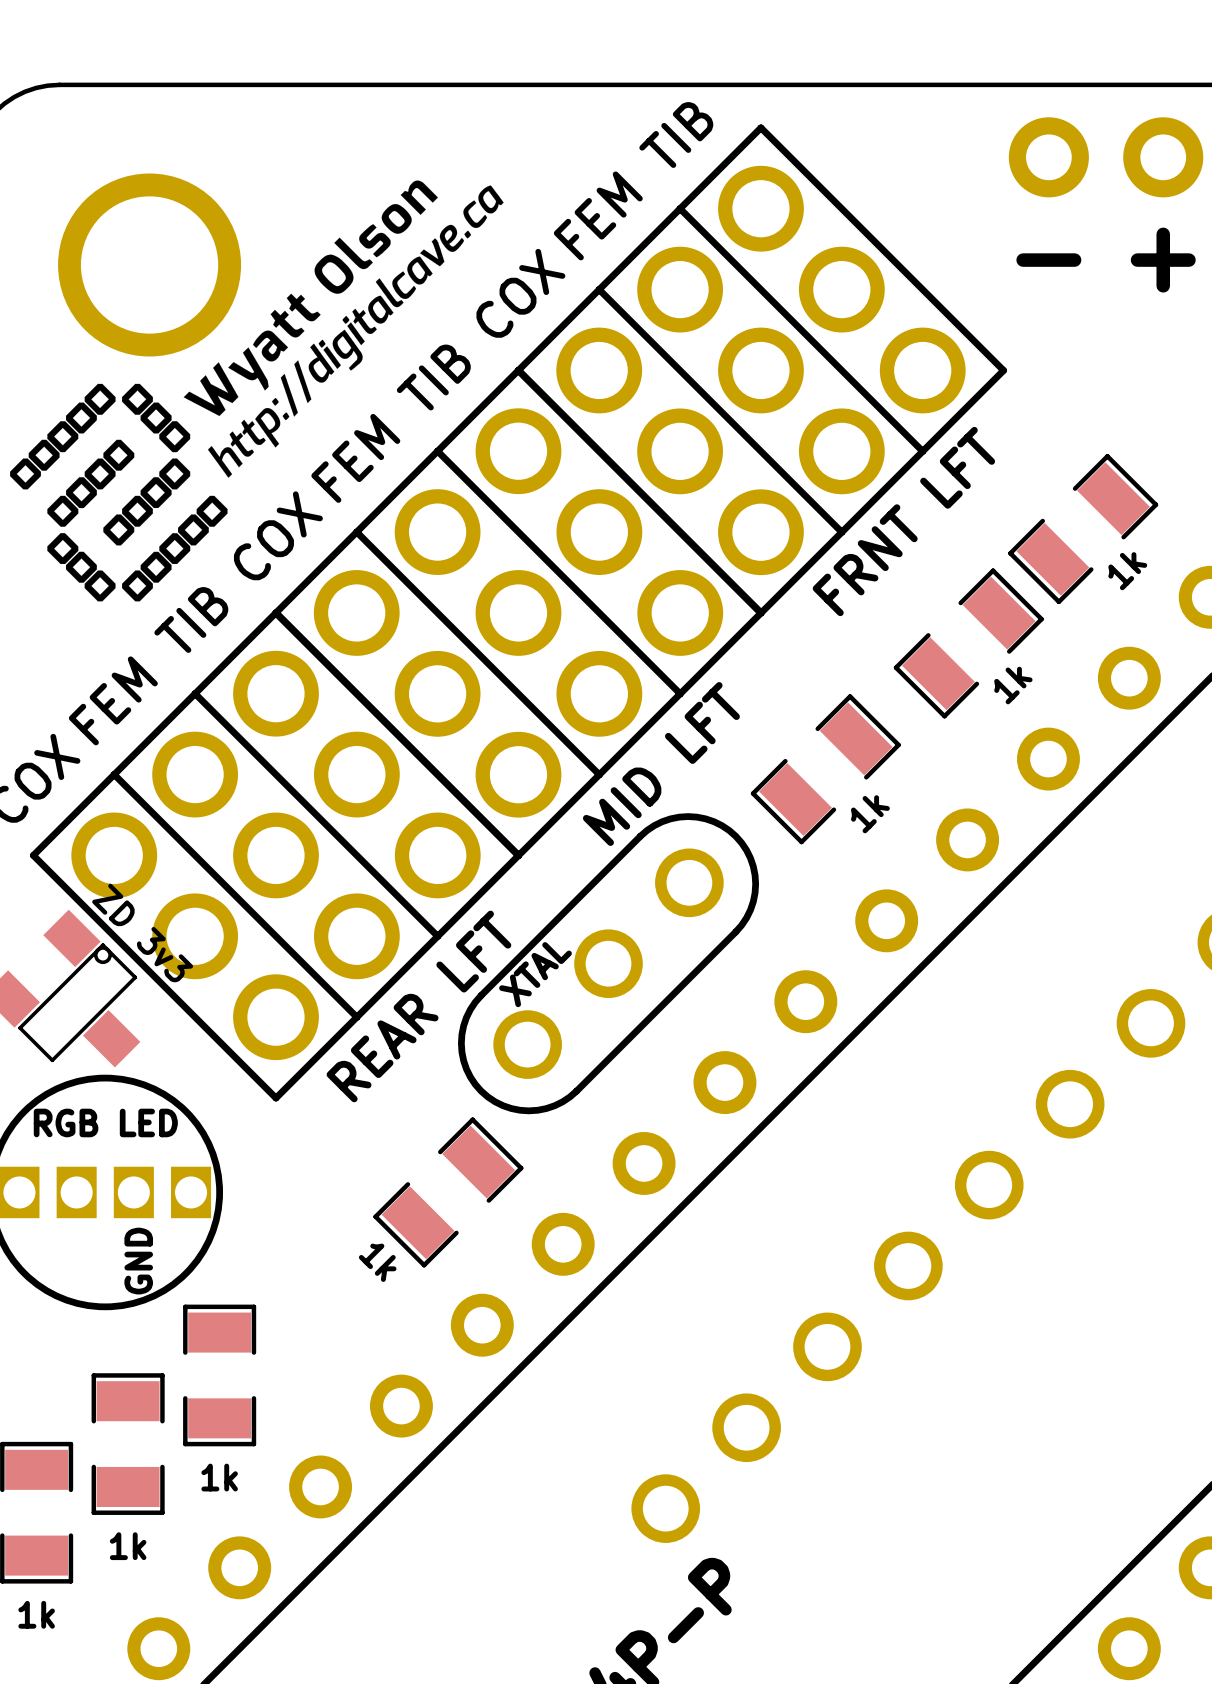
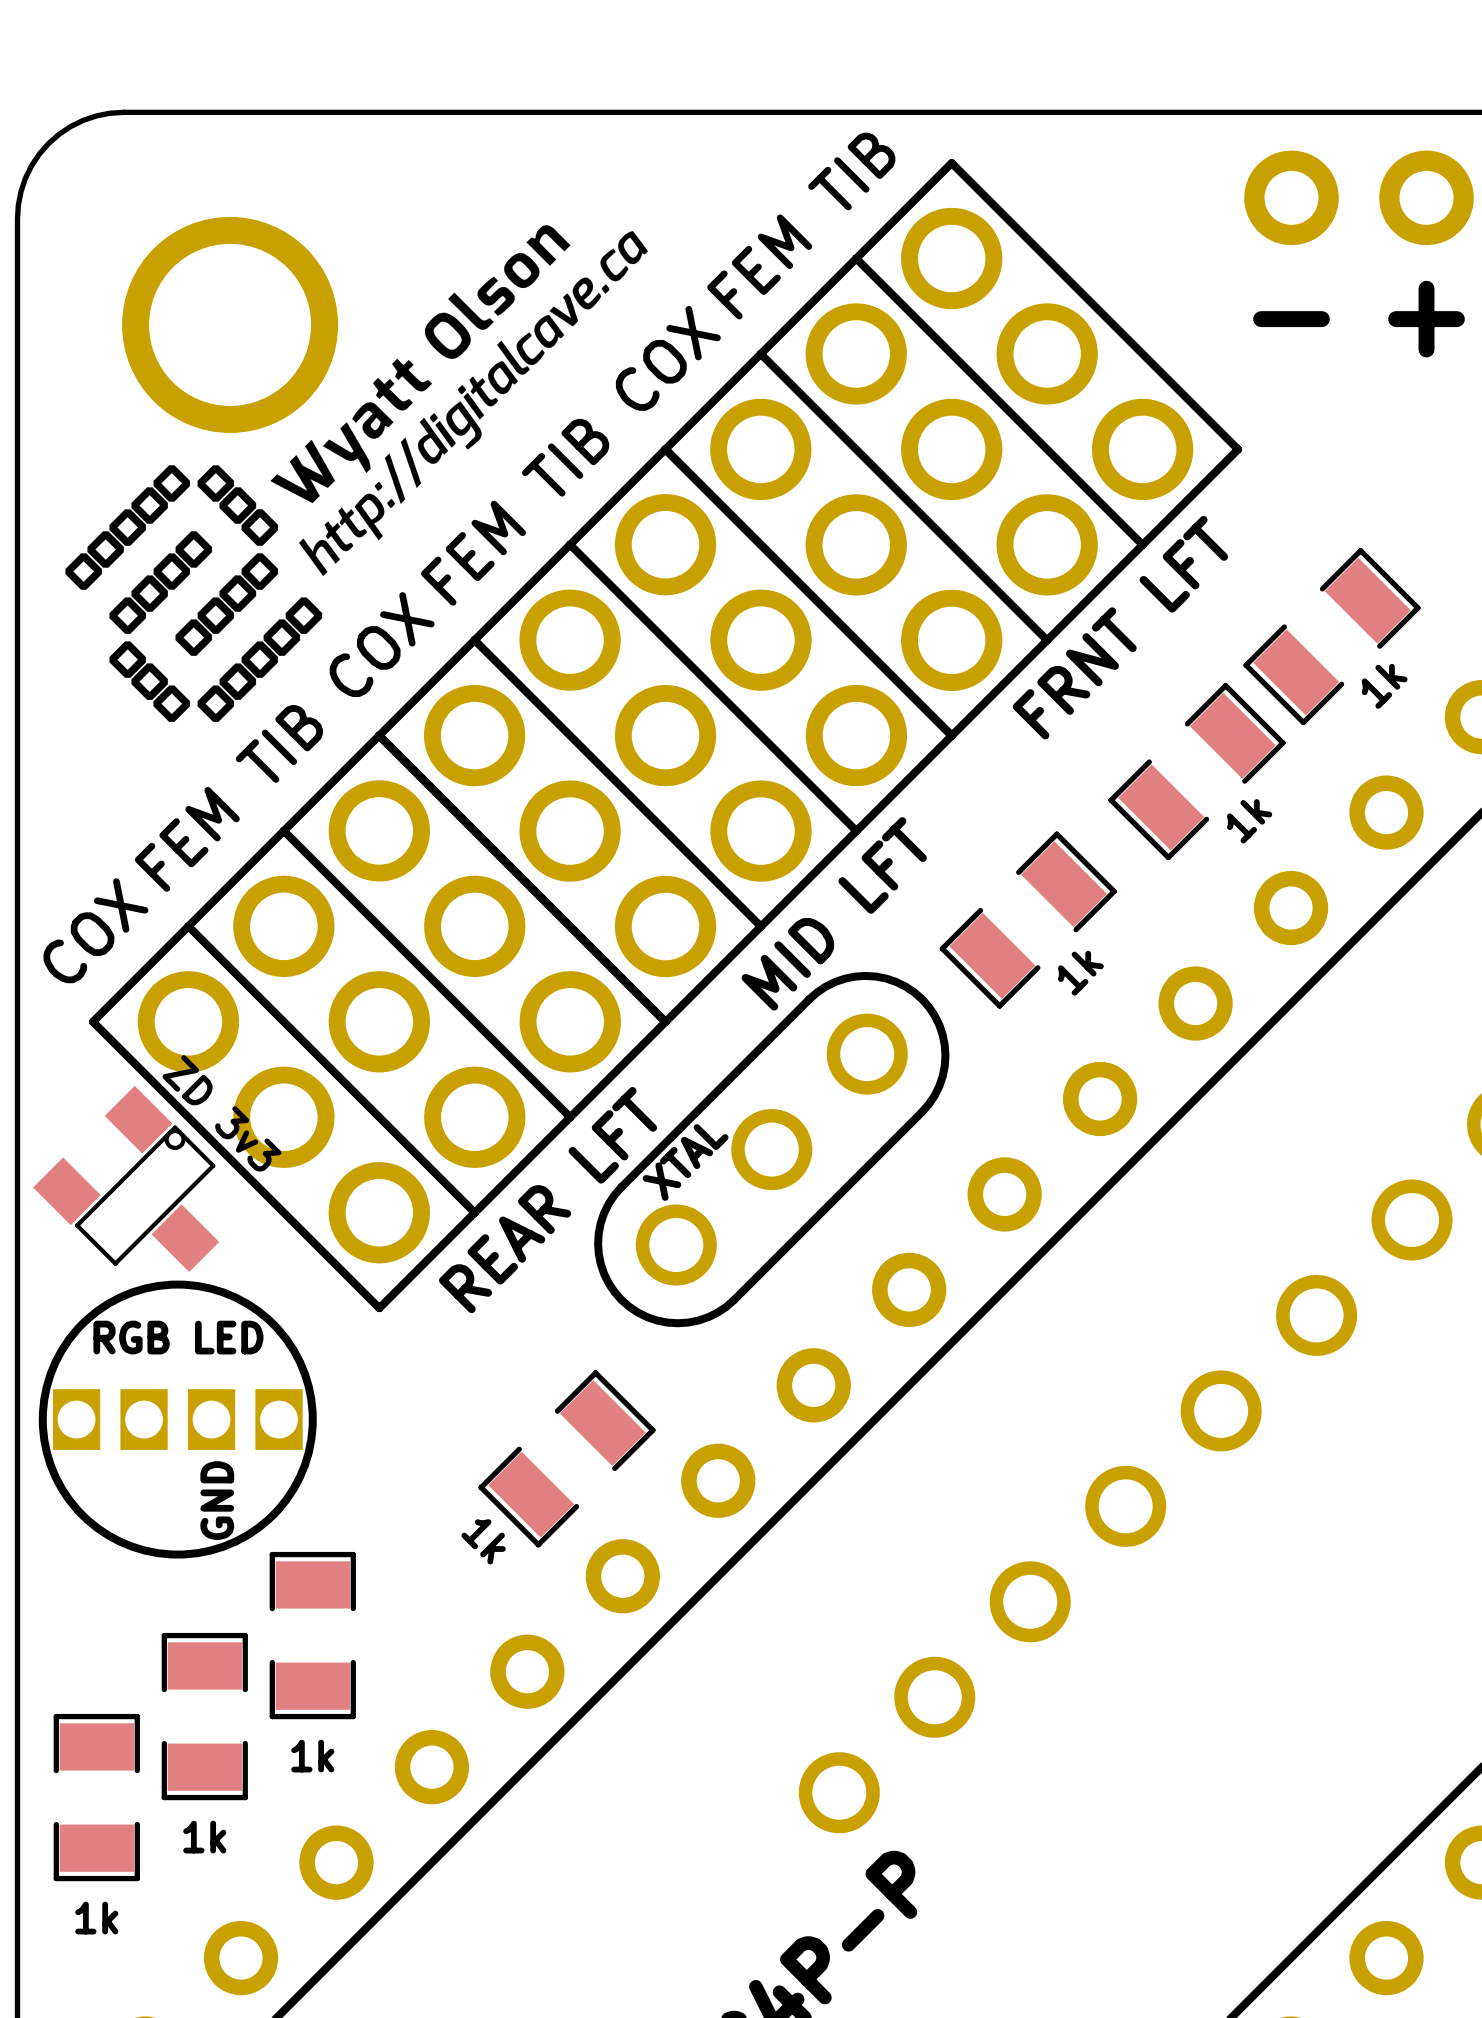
part position: (448, 1192) -> (566, 1458)

